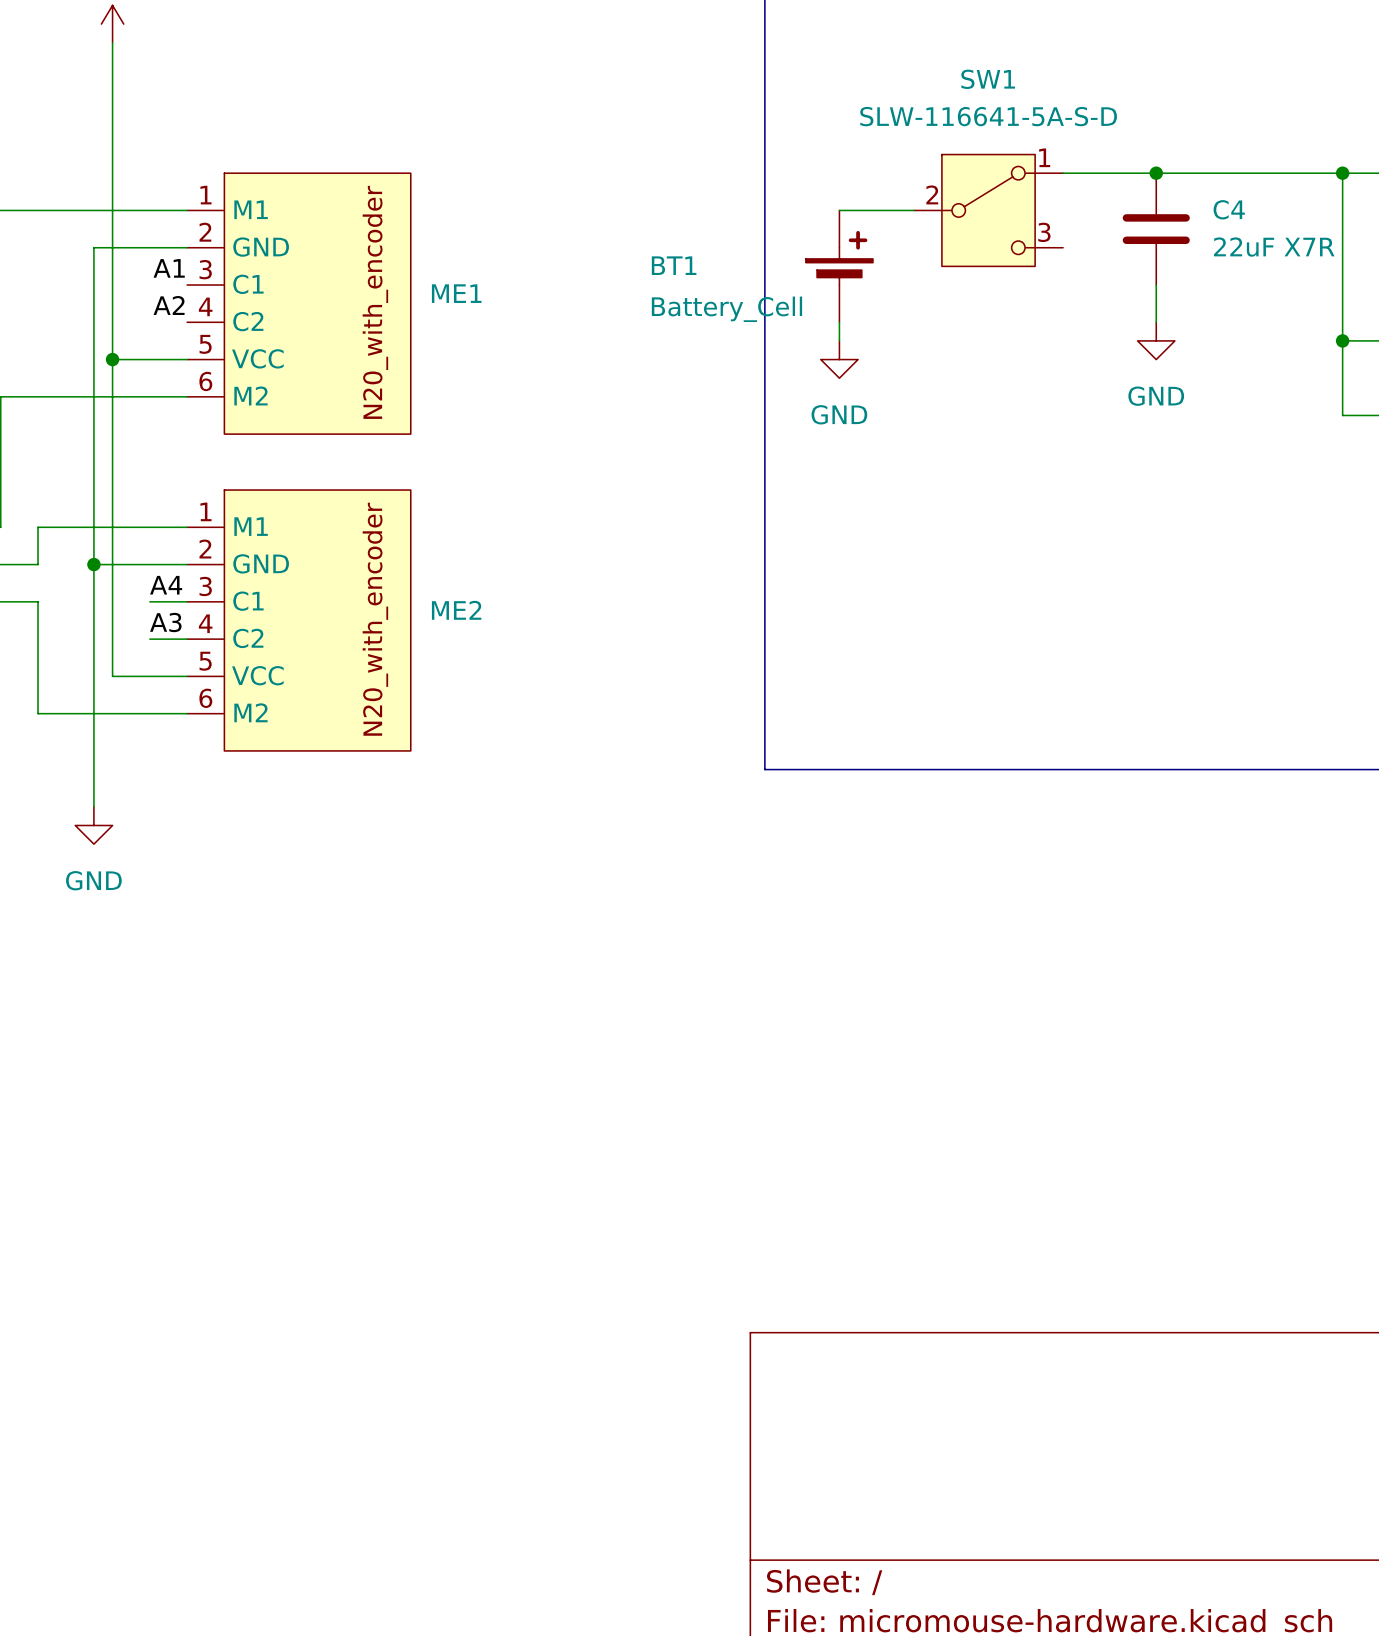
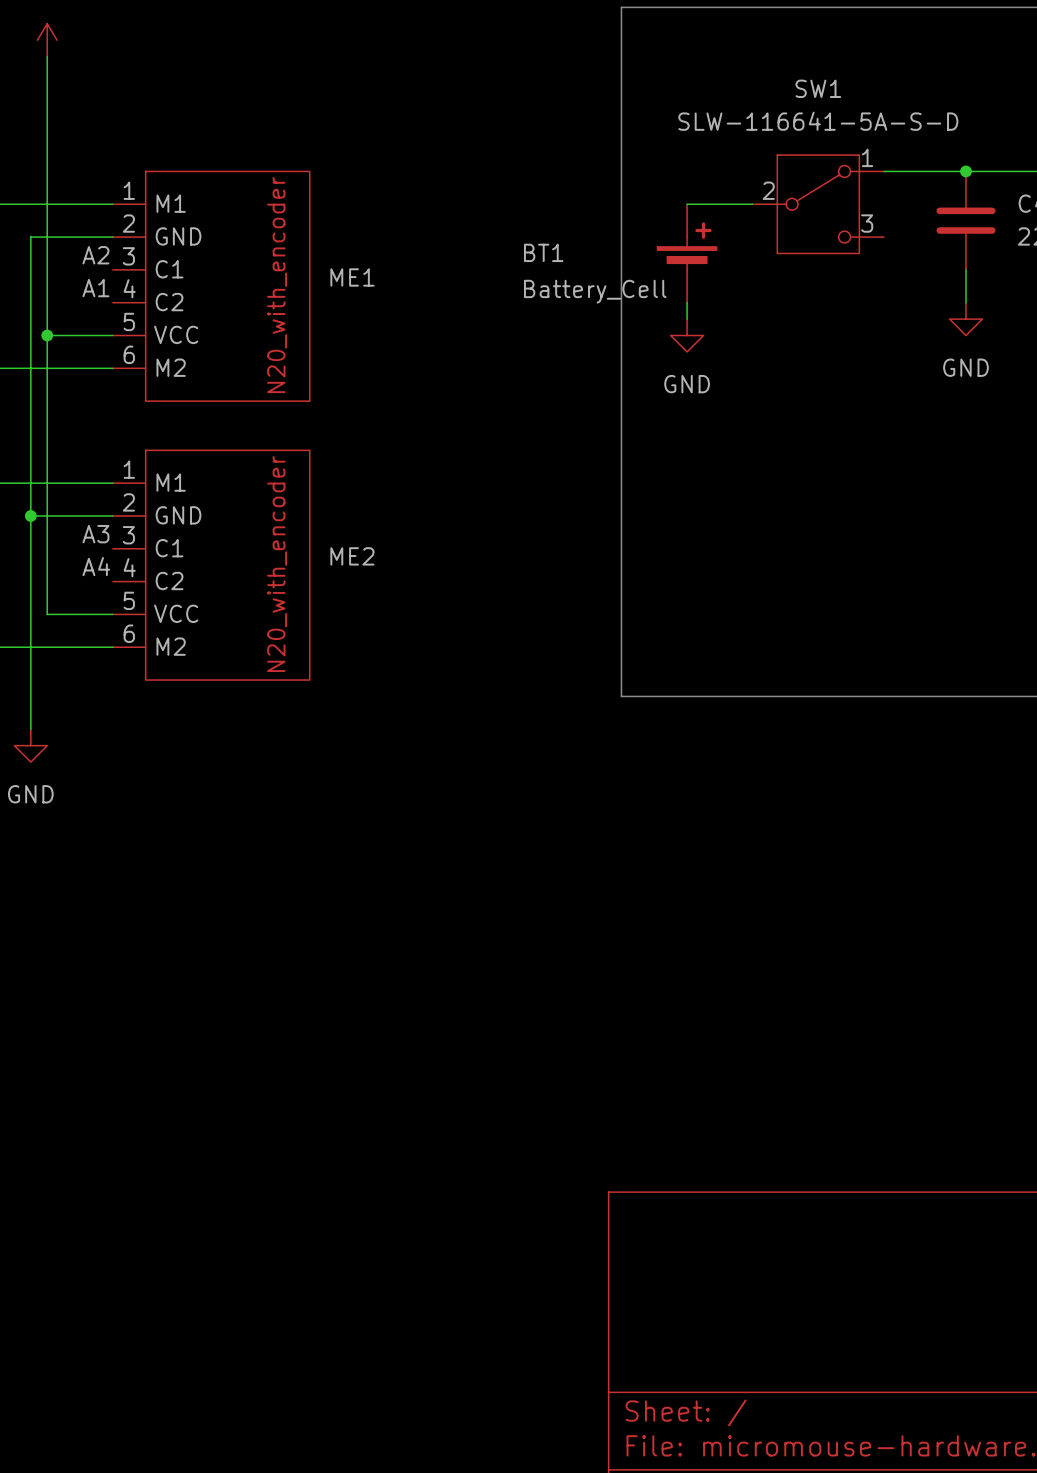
label: A1 (169, 268) -> A2 (95, 255)
label: A2 (169, 305) -> A1 (95, 288)
label position: A4 (166, 585) -> A4 (96, 566)
wire: (149, 601) (187, 601) -> none
label position: A3 (165, 622) -> A3 (95, 534)
wire: (149, 639) (187, 639) -> none

